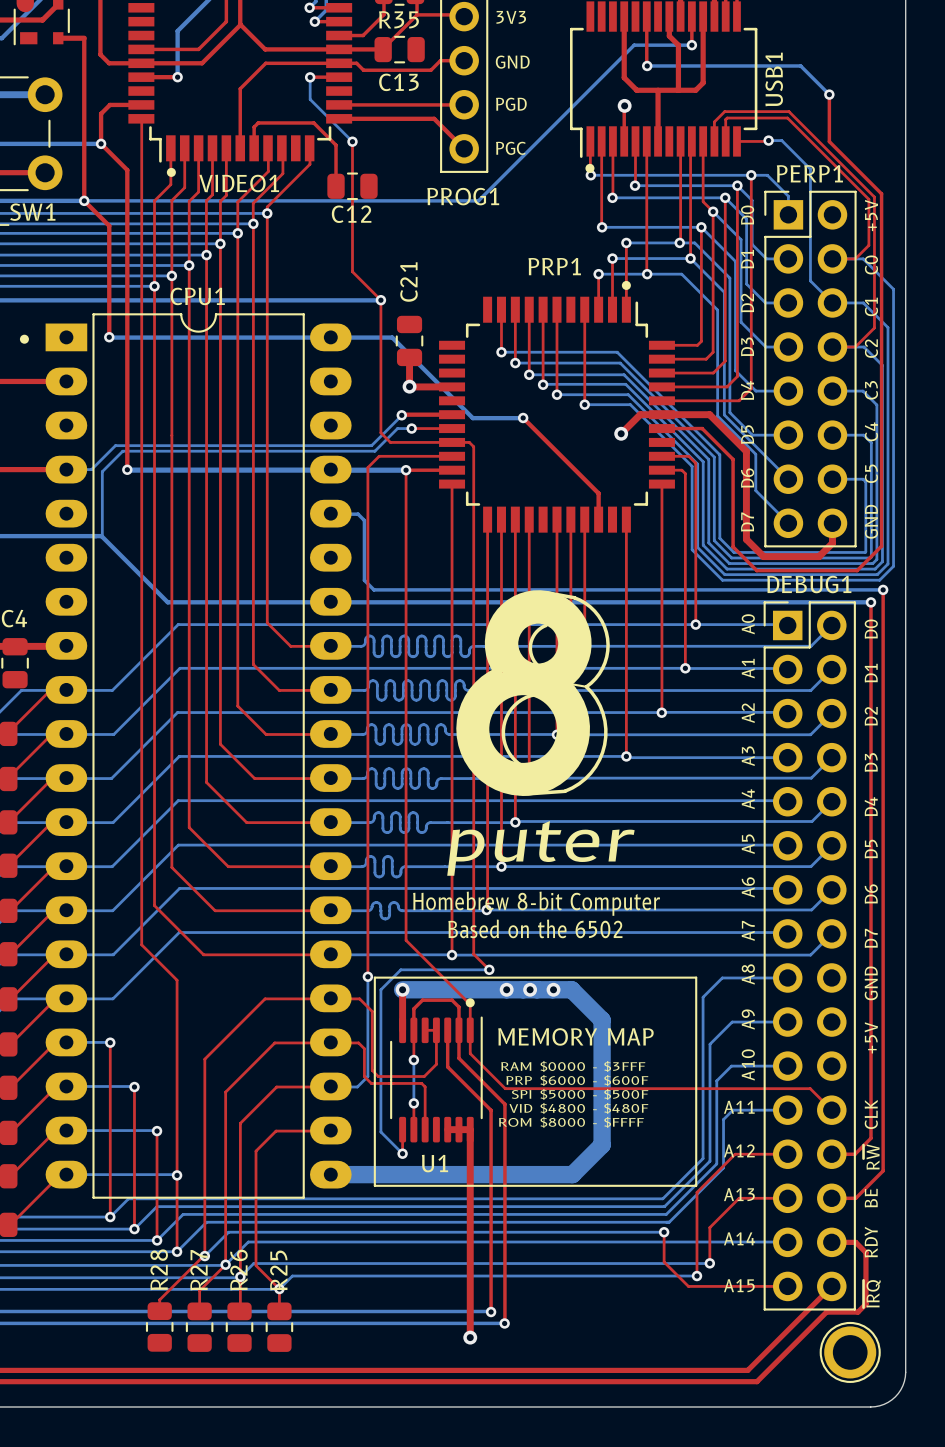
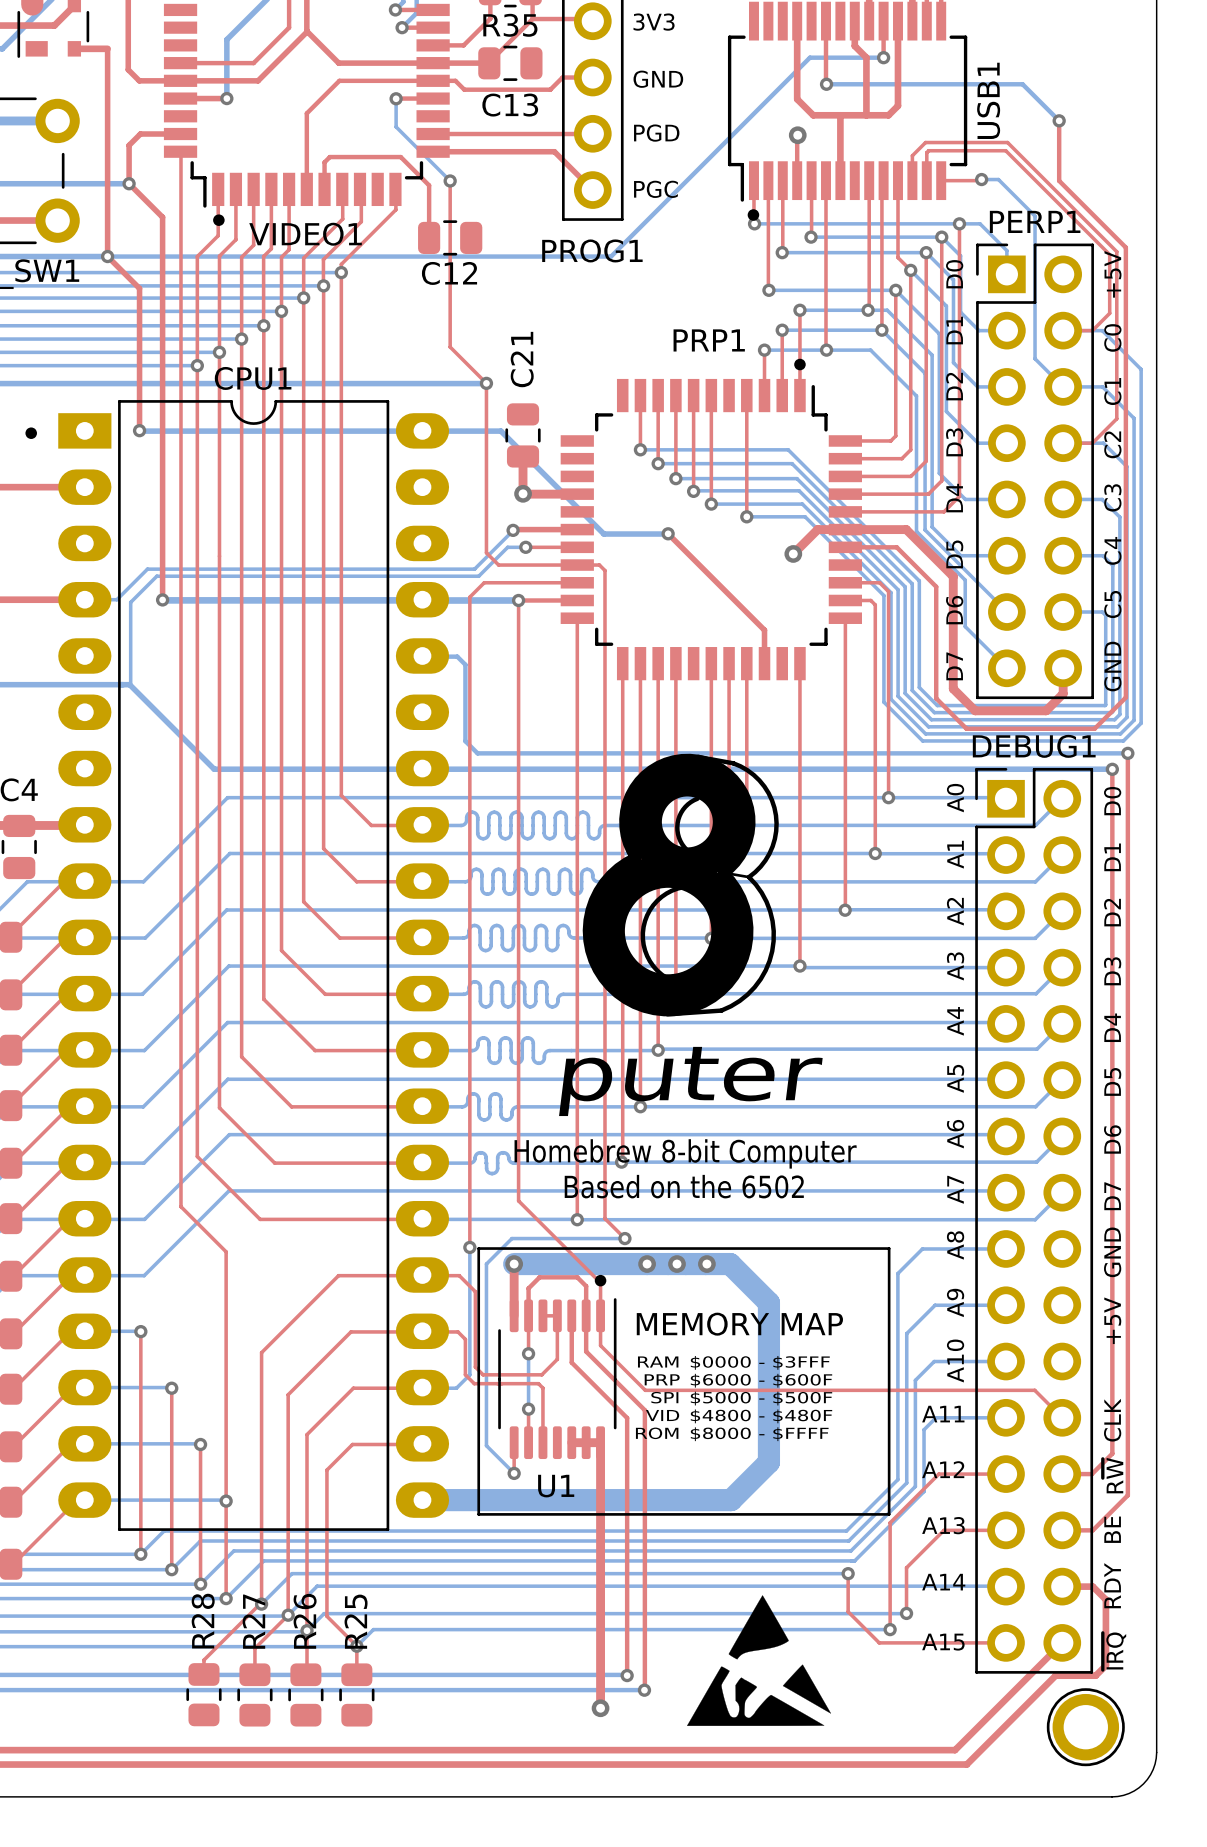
drawing: none -> [687, 1595, 831, 1726]

